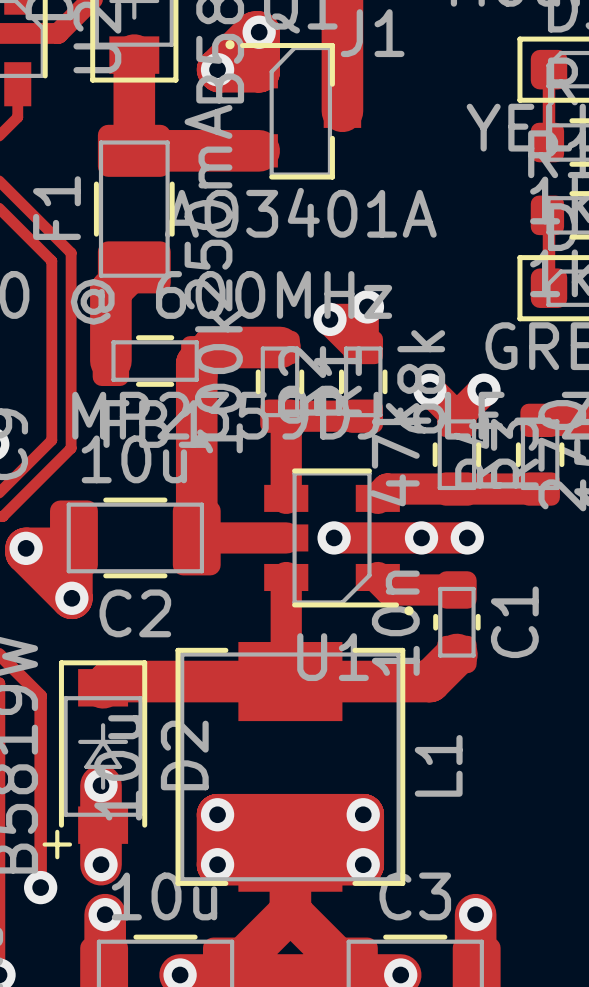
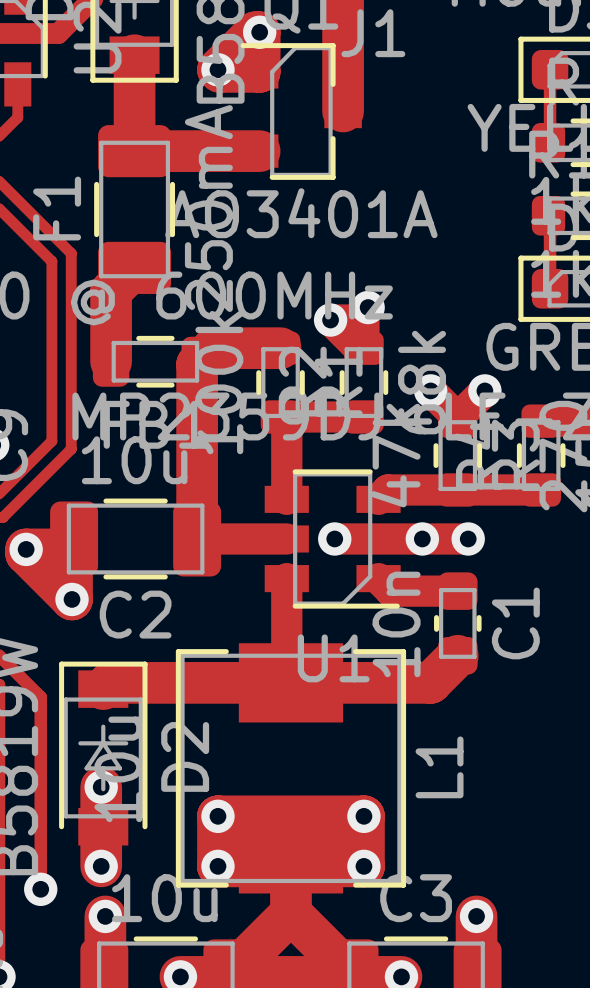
drawing: [225, 40, 235, 50] -> none
drawing: [404, 606, 414, 616] -> none
text: + (57, 844) -> none

